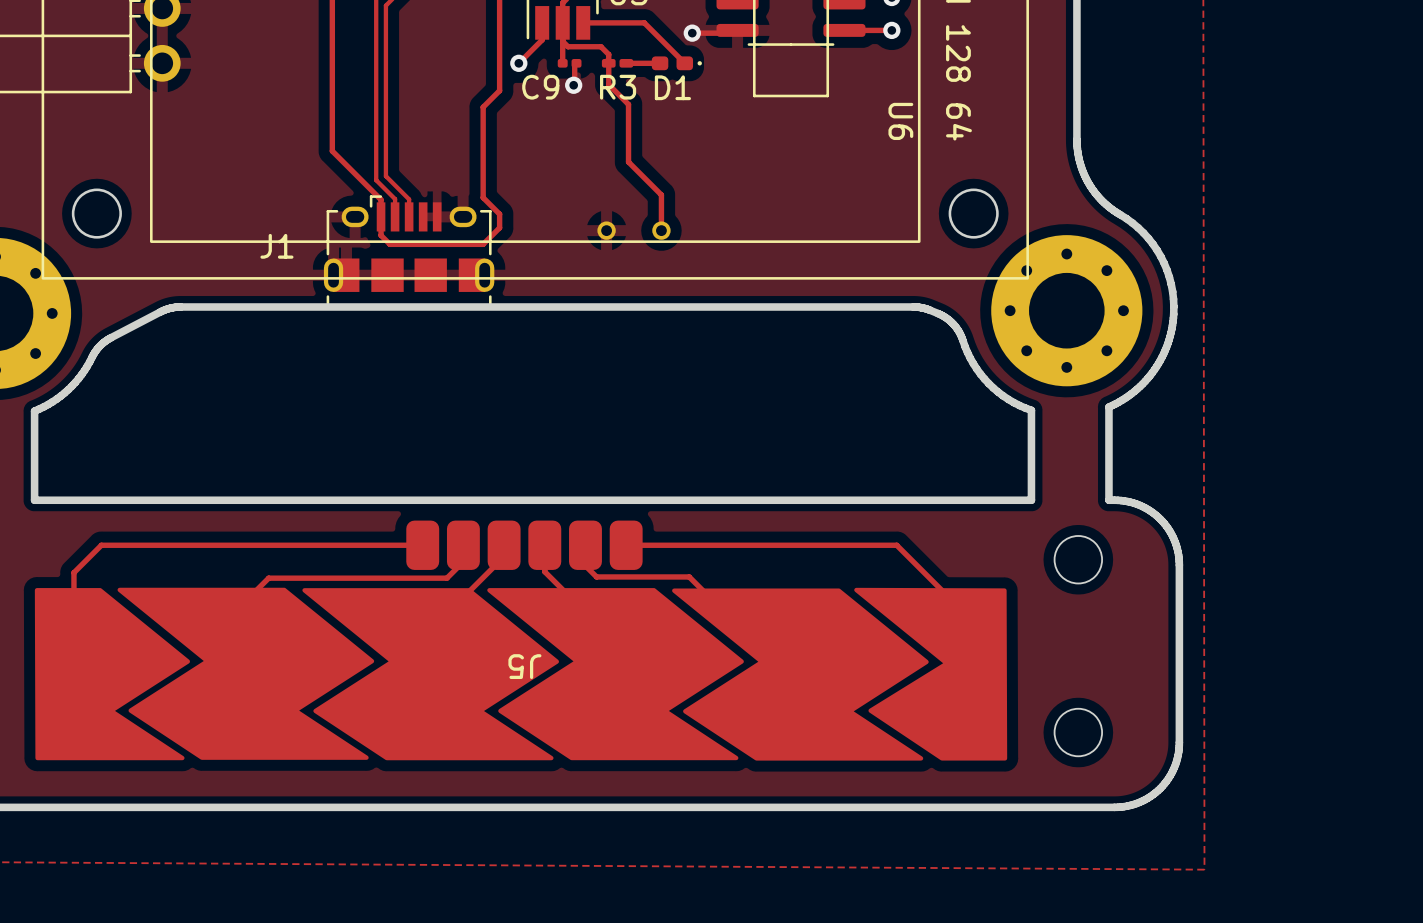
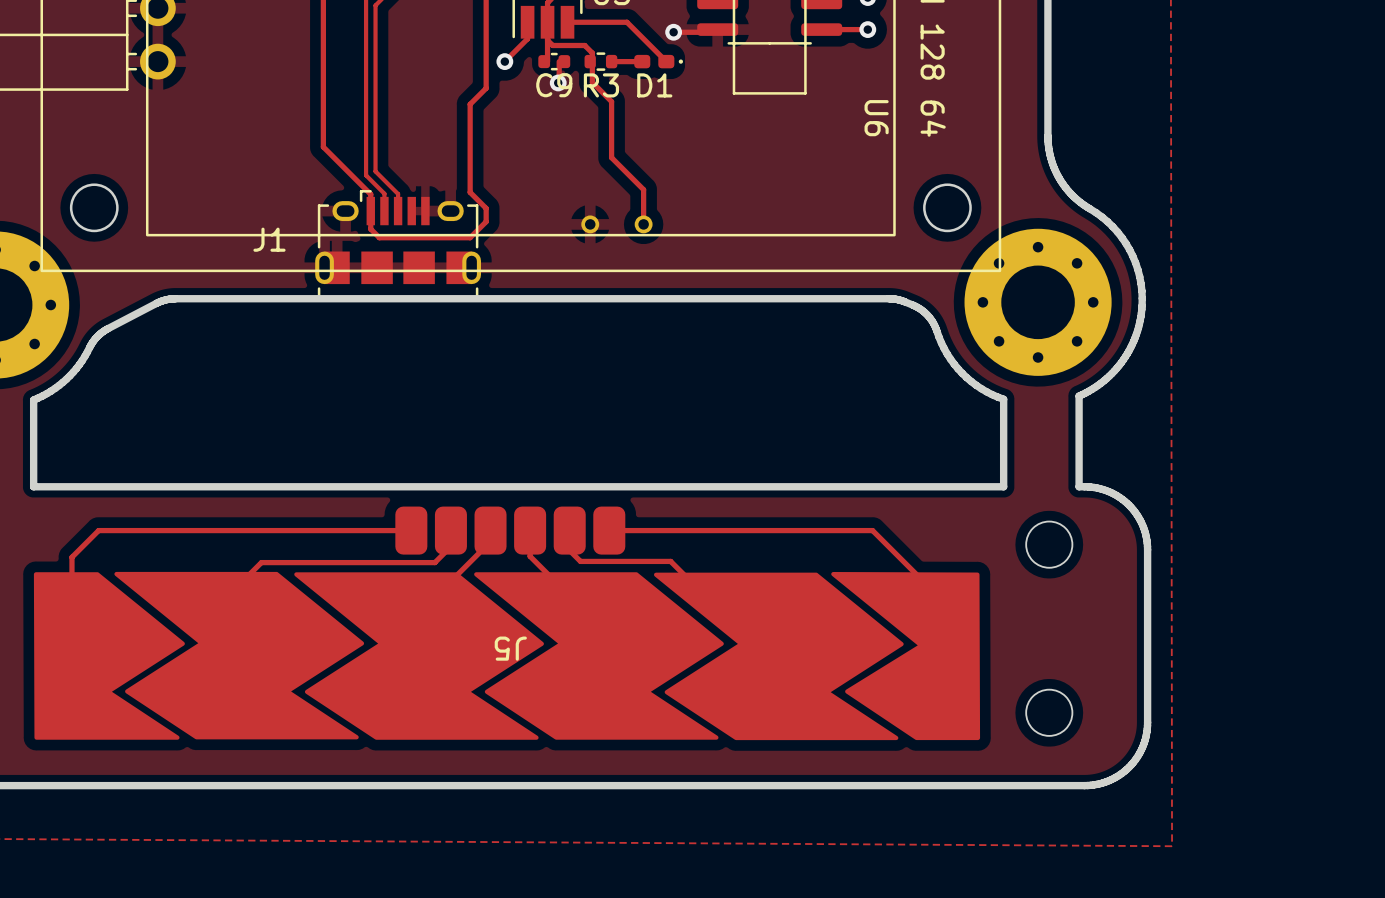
C9 footprint: [557, 58, 582, 68] -> [538, 52, 571, 71]
R3 footprint: [601, 58, 634, 68] -> [584, 52, 618, 71]

